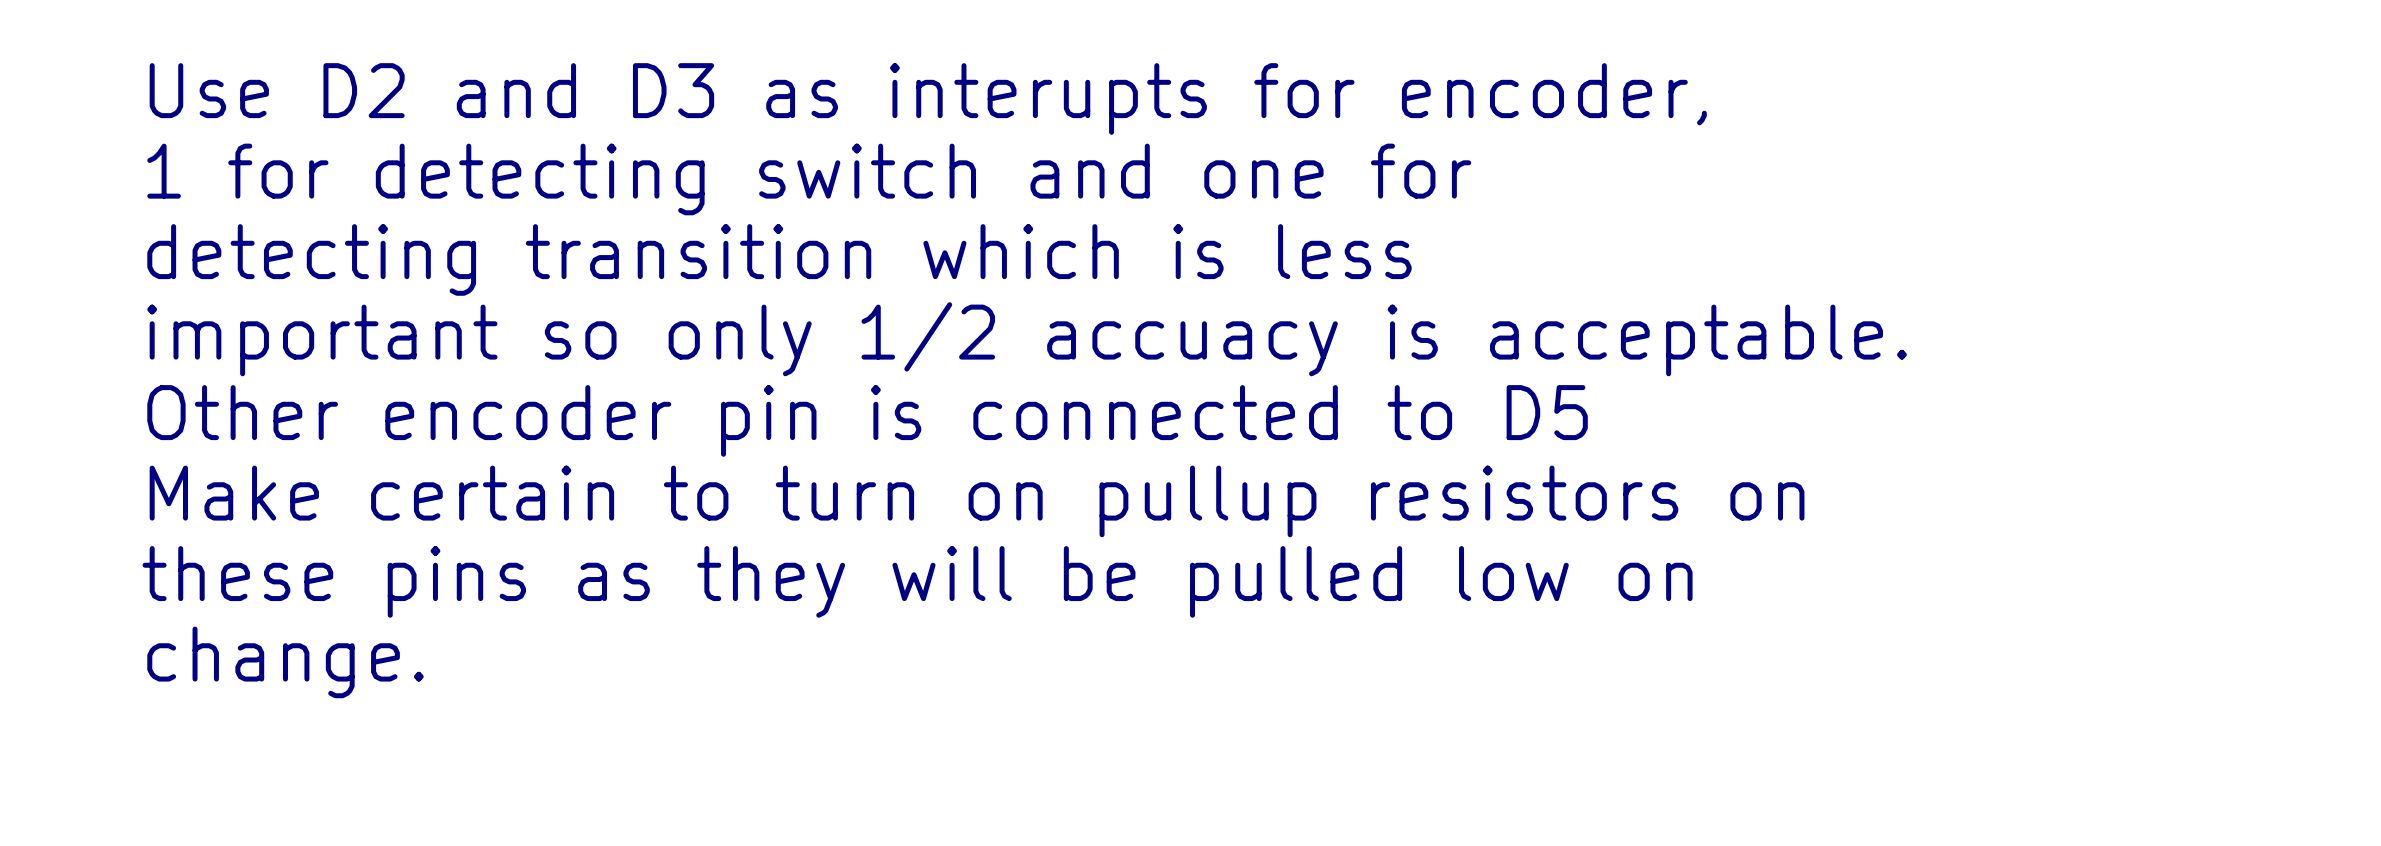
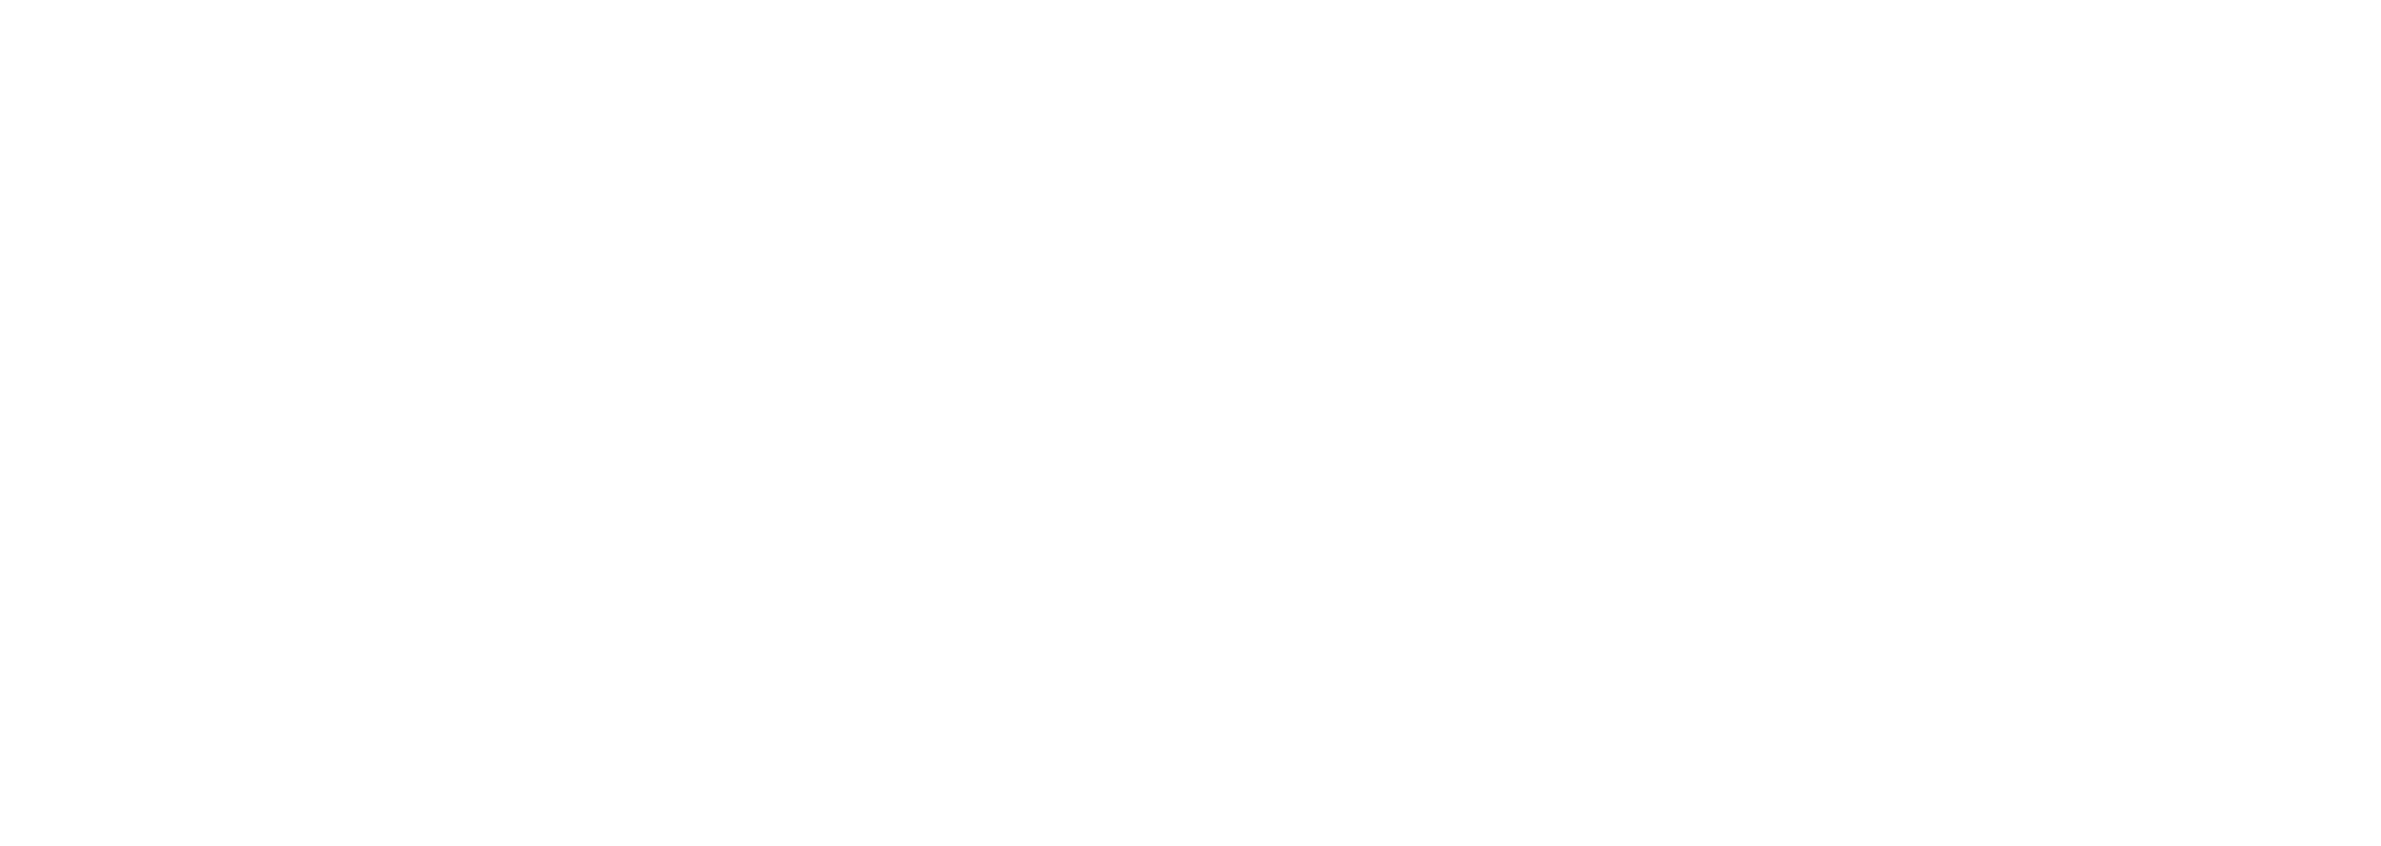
text: Use D2 and D3 as interupts for encoder, (928, 98) -> none
text: 1 for detecting switch and one for (809, 179) -> none
text: detecting transition which is less (779, 259) -> none
text: important so only 1/2 accuacy is acceptable. (1027, 339) -> none
text: Other encoder pin is connected to D5 (867, 420) -> none
text: Make certain to turn on pullup resistors on (977, 501) -> none
text: these pins as they will be pulled low on (917, 581) -> none
text: change. (285, 662) -> none

